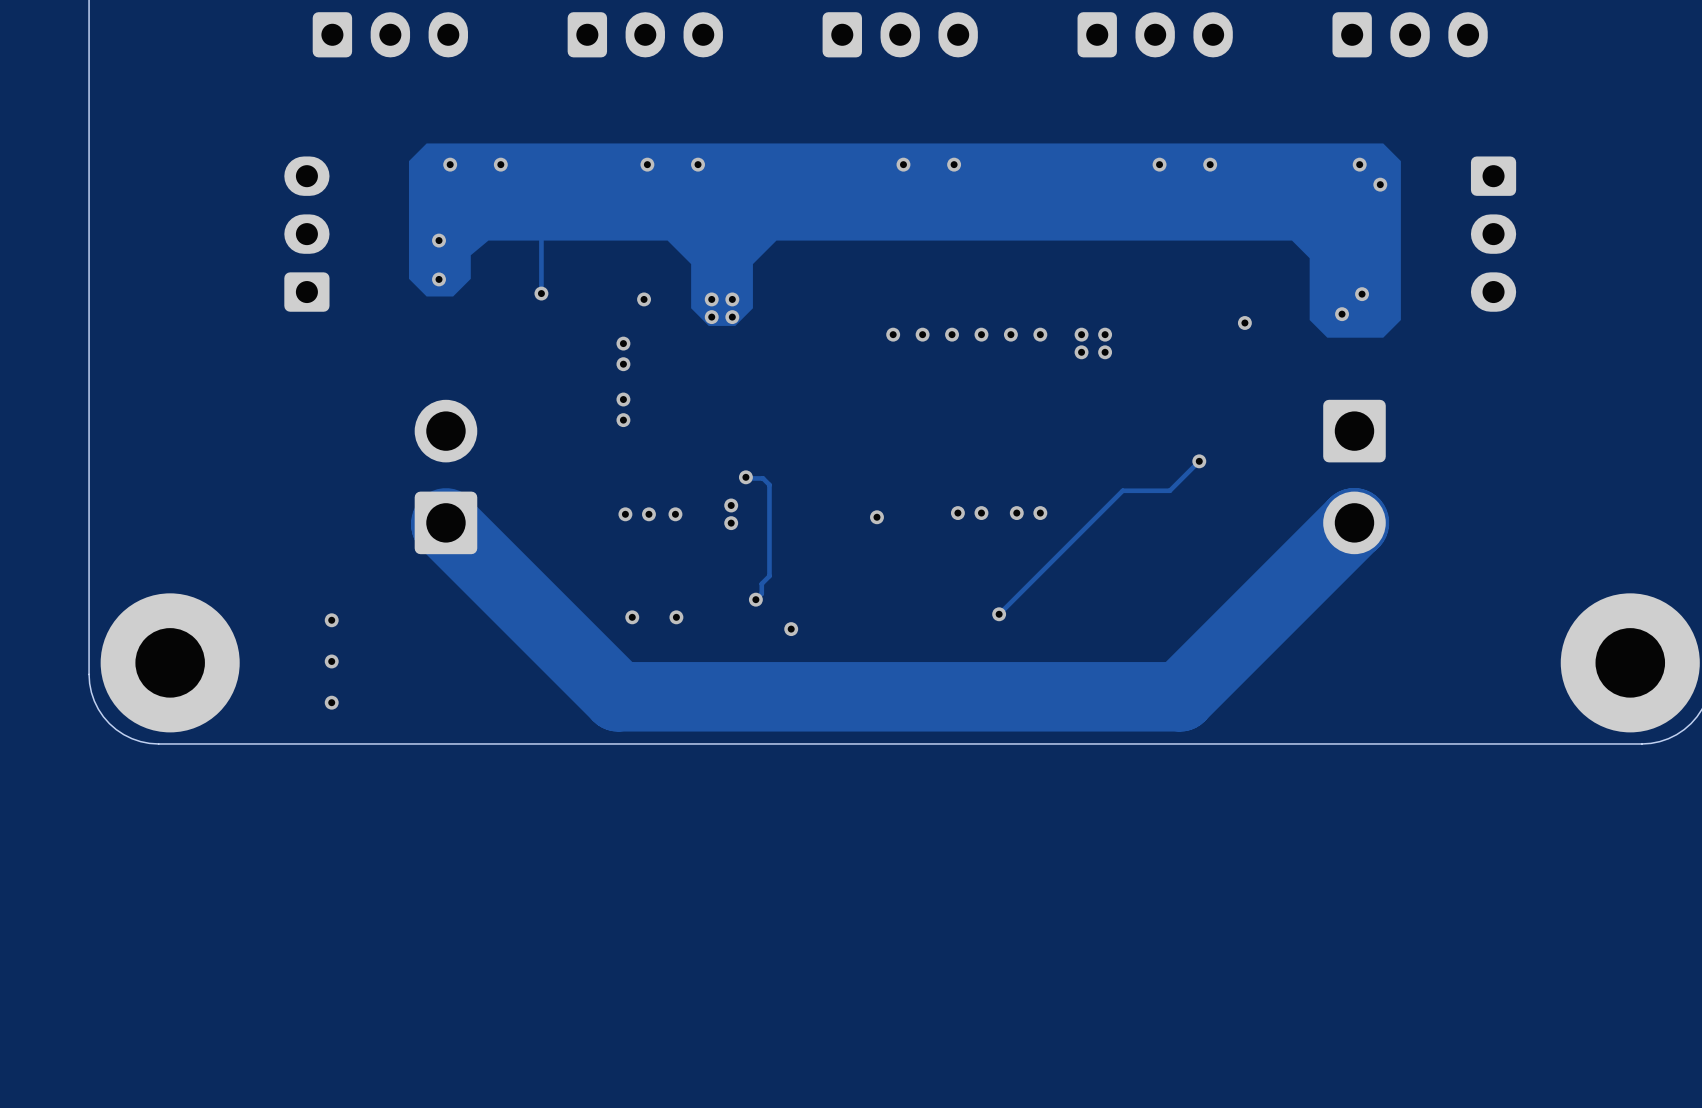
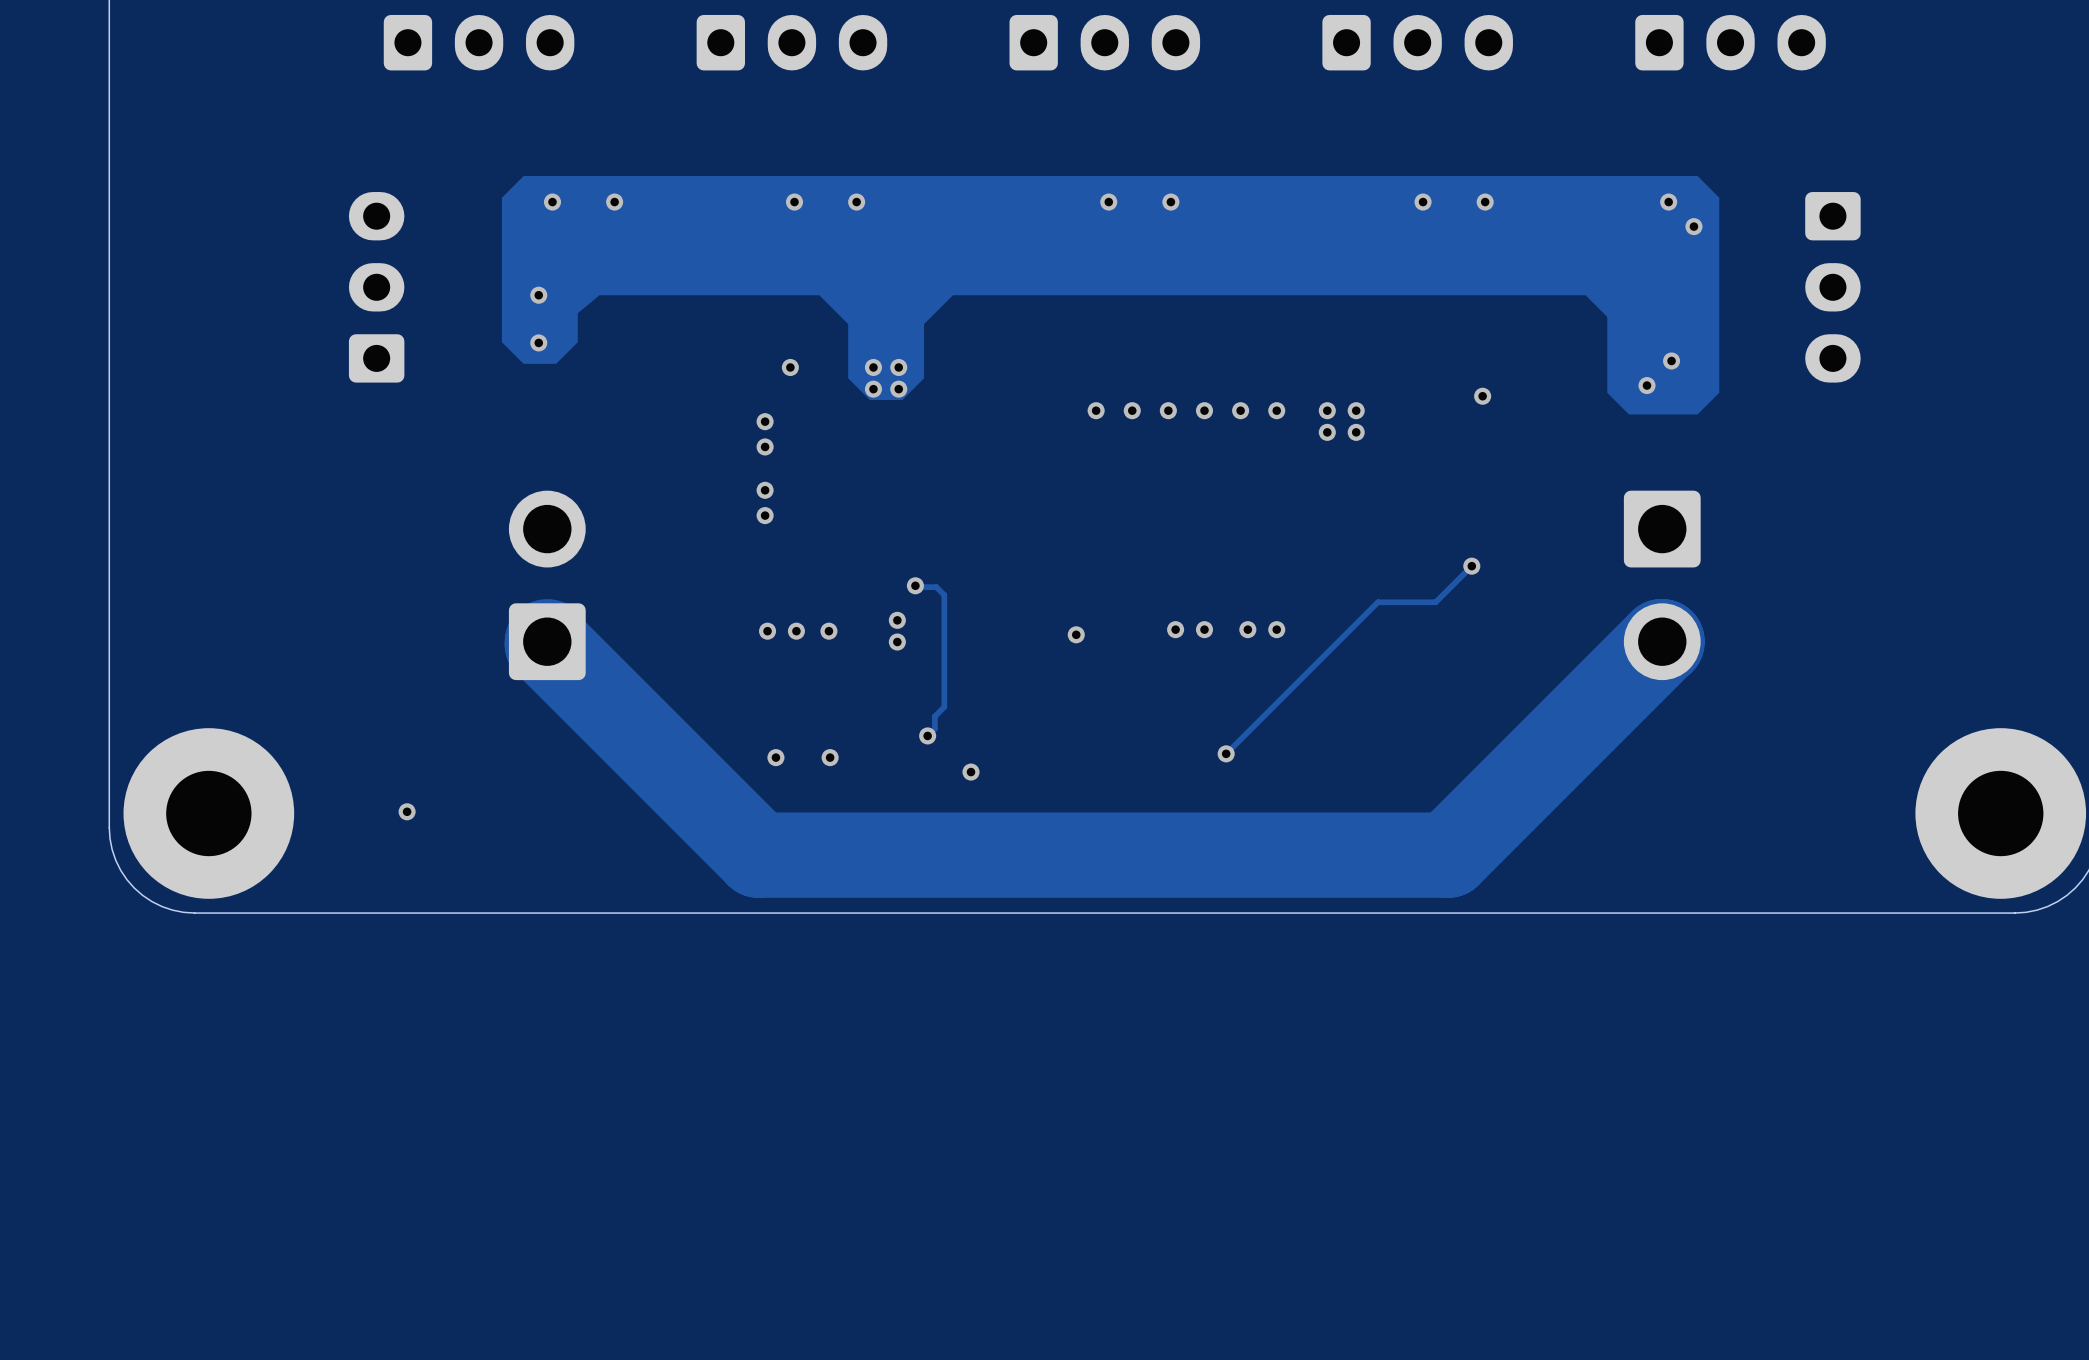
track: (541, 234) (541, 293) -> none
via: (541, 293) -> none
via position: (1244, 322) -> (1482, 396)
via: (331, 620) -> none
via: (331, 702) -> none

